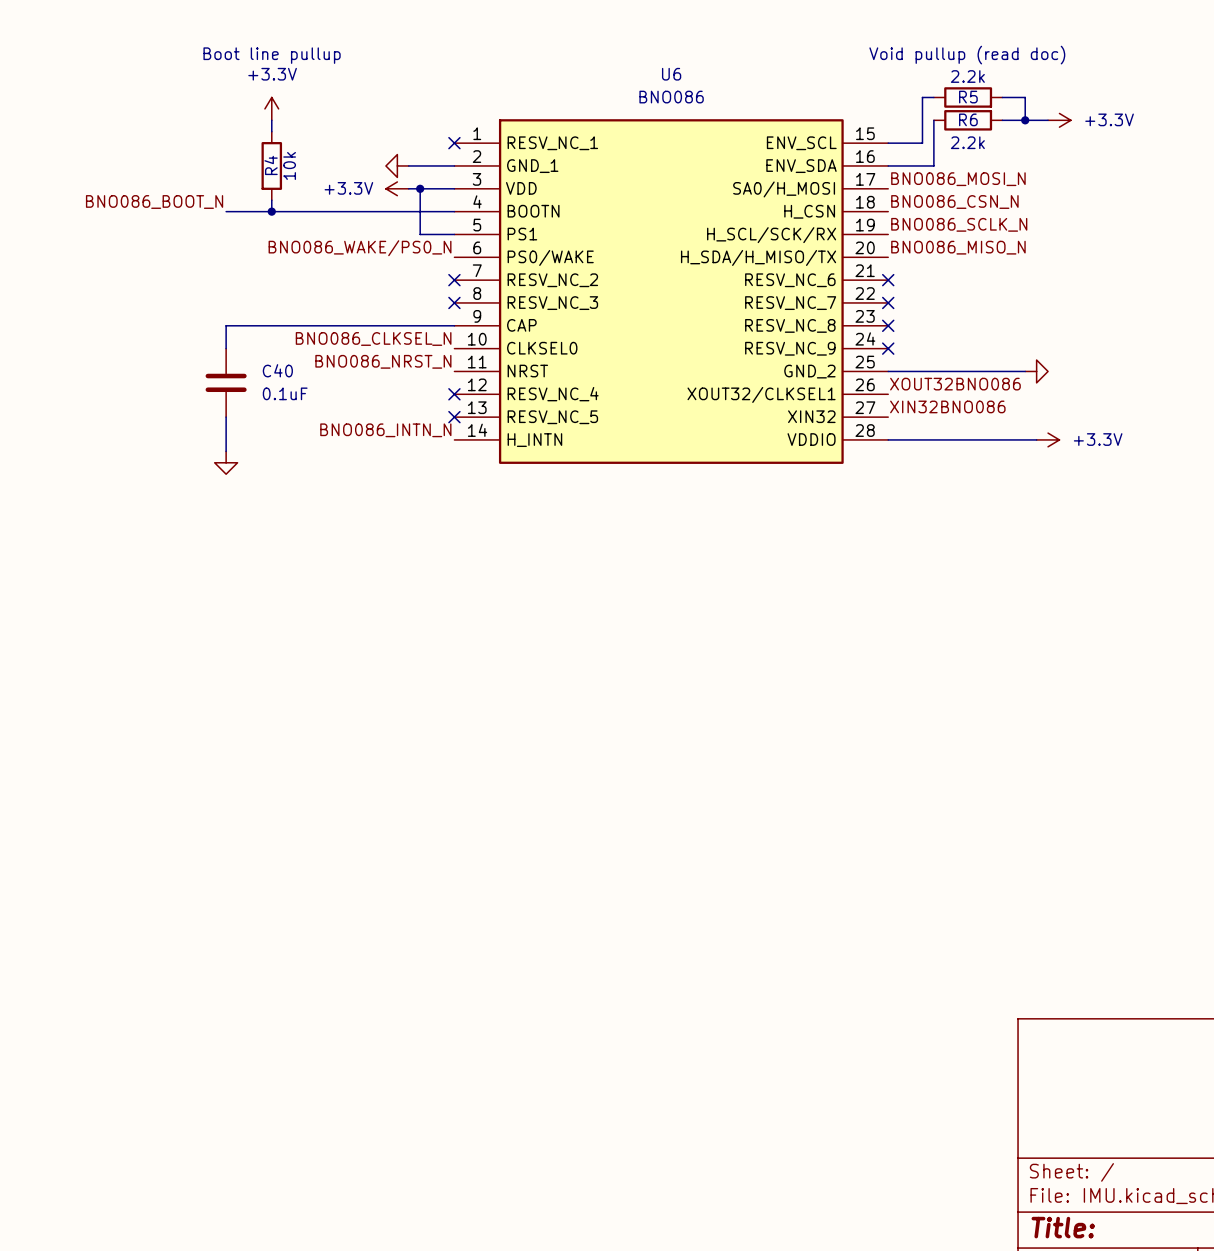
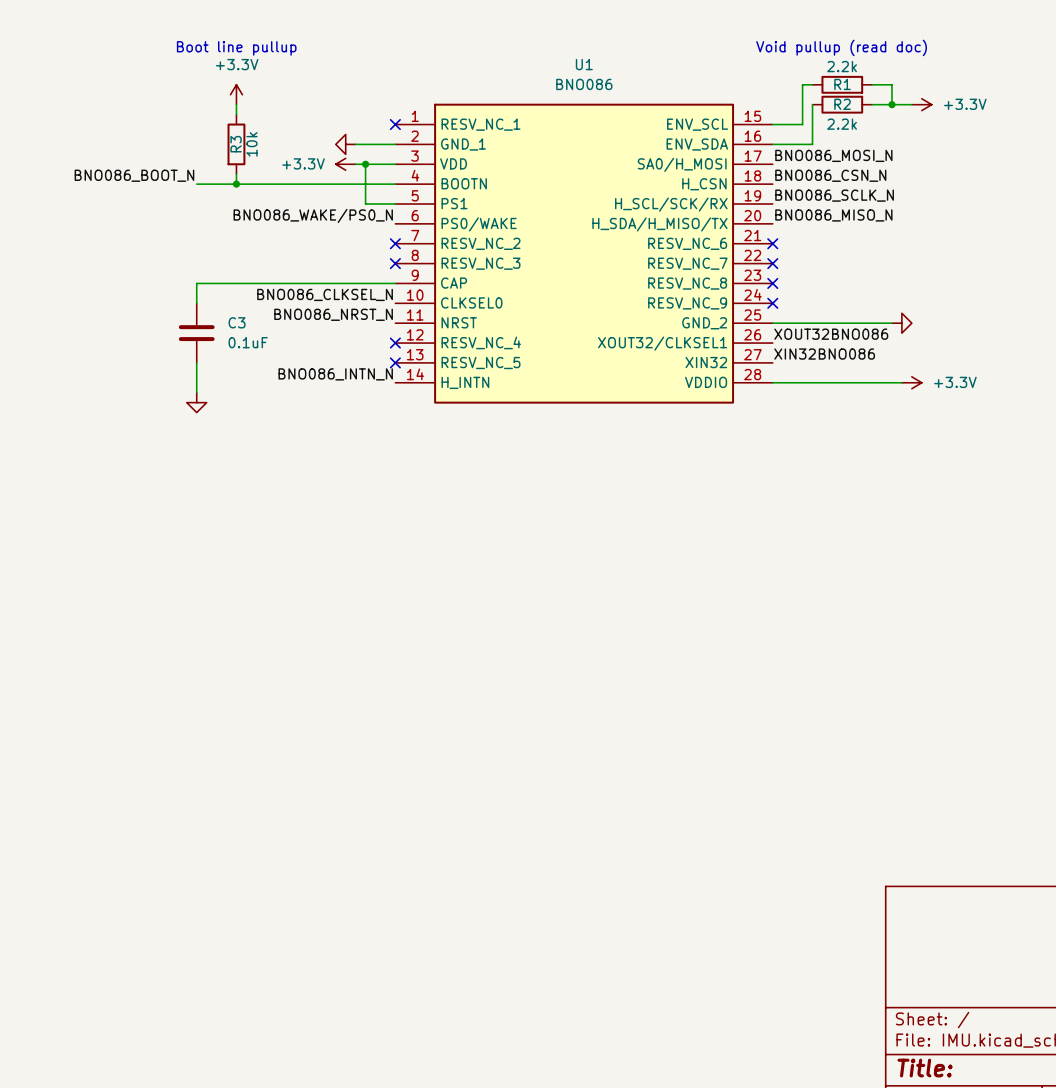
U6 name: U6 (671, 74) -> U1 (584, 64)
R5 name: R5 (968, 97) -> R1 (842, 84)
R6 name: R6 (968, 119) -> R2 (842, 104)
R4 name: R4 (271, 165) -> R3 (236, 144)
C40 name: C40 (277, 370) -> C3 (237, 322)

